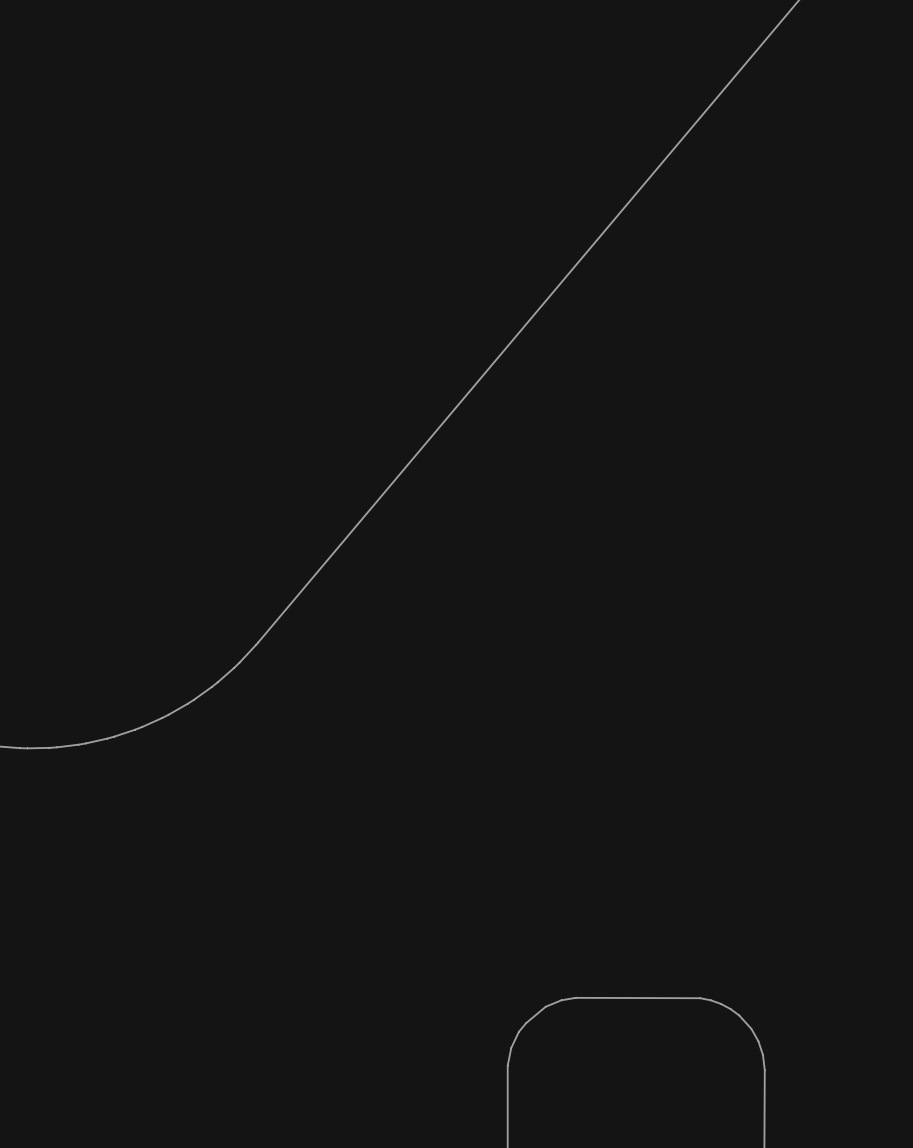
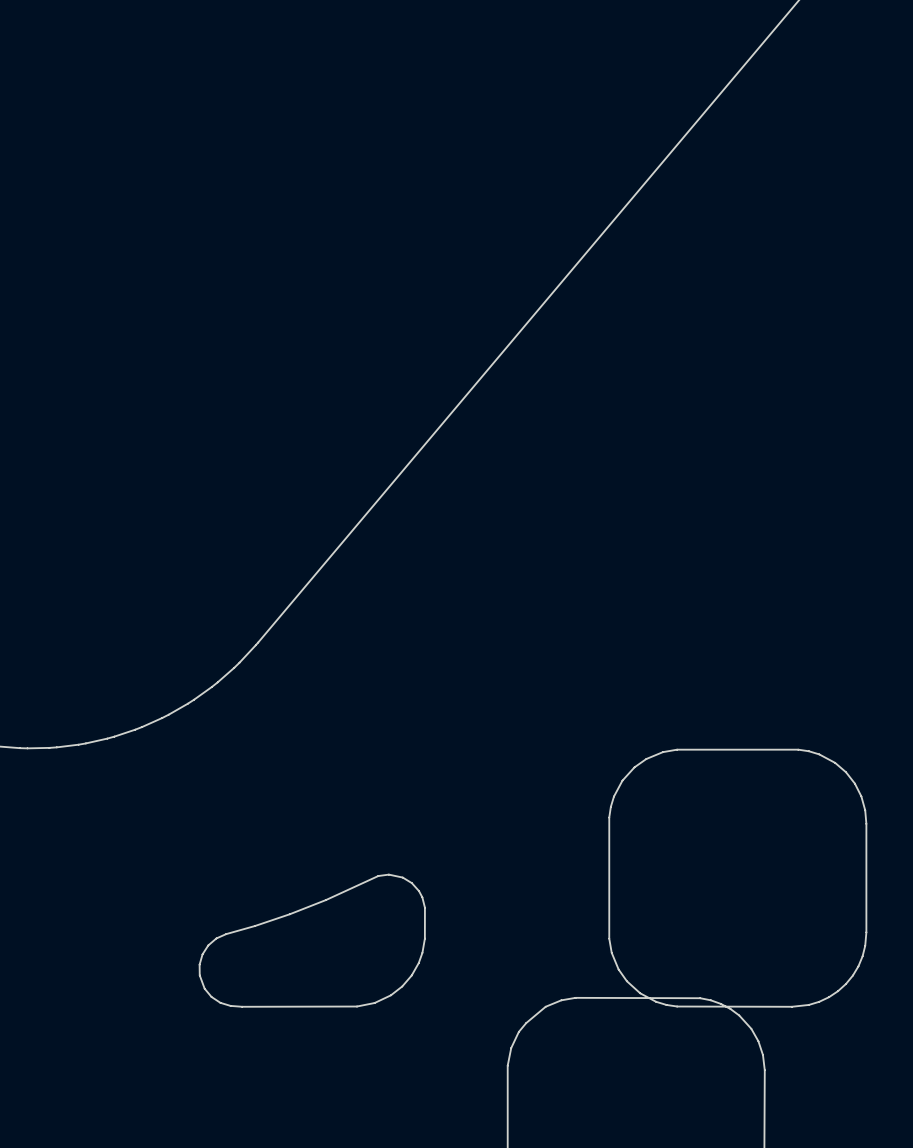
board edge: none -> (677, 749) (808, 751) (835, 762) (854, 783) (861, 796) (866, 823) (865, 945) (862, 956) (852, 975) (846, 983) (829, 997) (808, 1004) (791, 1006) (677, 1006) (656, 1001) (640, 993) (626, 981) (618, 969) (611, 952) (609, 938) (610, 806) (622, 780) (634, 767) (646, 759) (662, 752) (677, 749)
board edge: none -> (388, 874) (378, 876) (289, 914) (216, 938) (208, 945) (202, 954) (199, 964) (199, 975) (204, 988) (211, 996) (220, 1002) (242, 1006) (357, 1006) (374, 1003) (390, 995) (402, 986) (418, 963) (424, 938) (424, 907) (422, 897) (411, 883) (402, 877) (388, 874)

